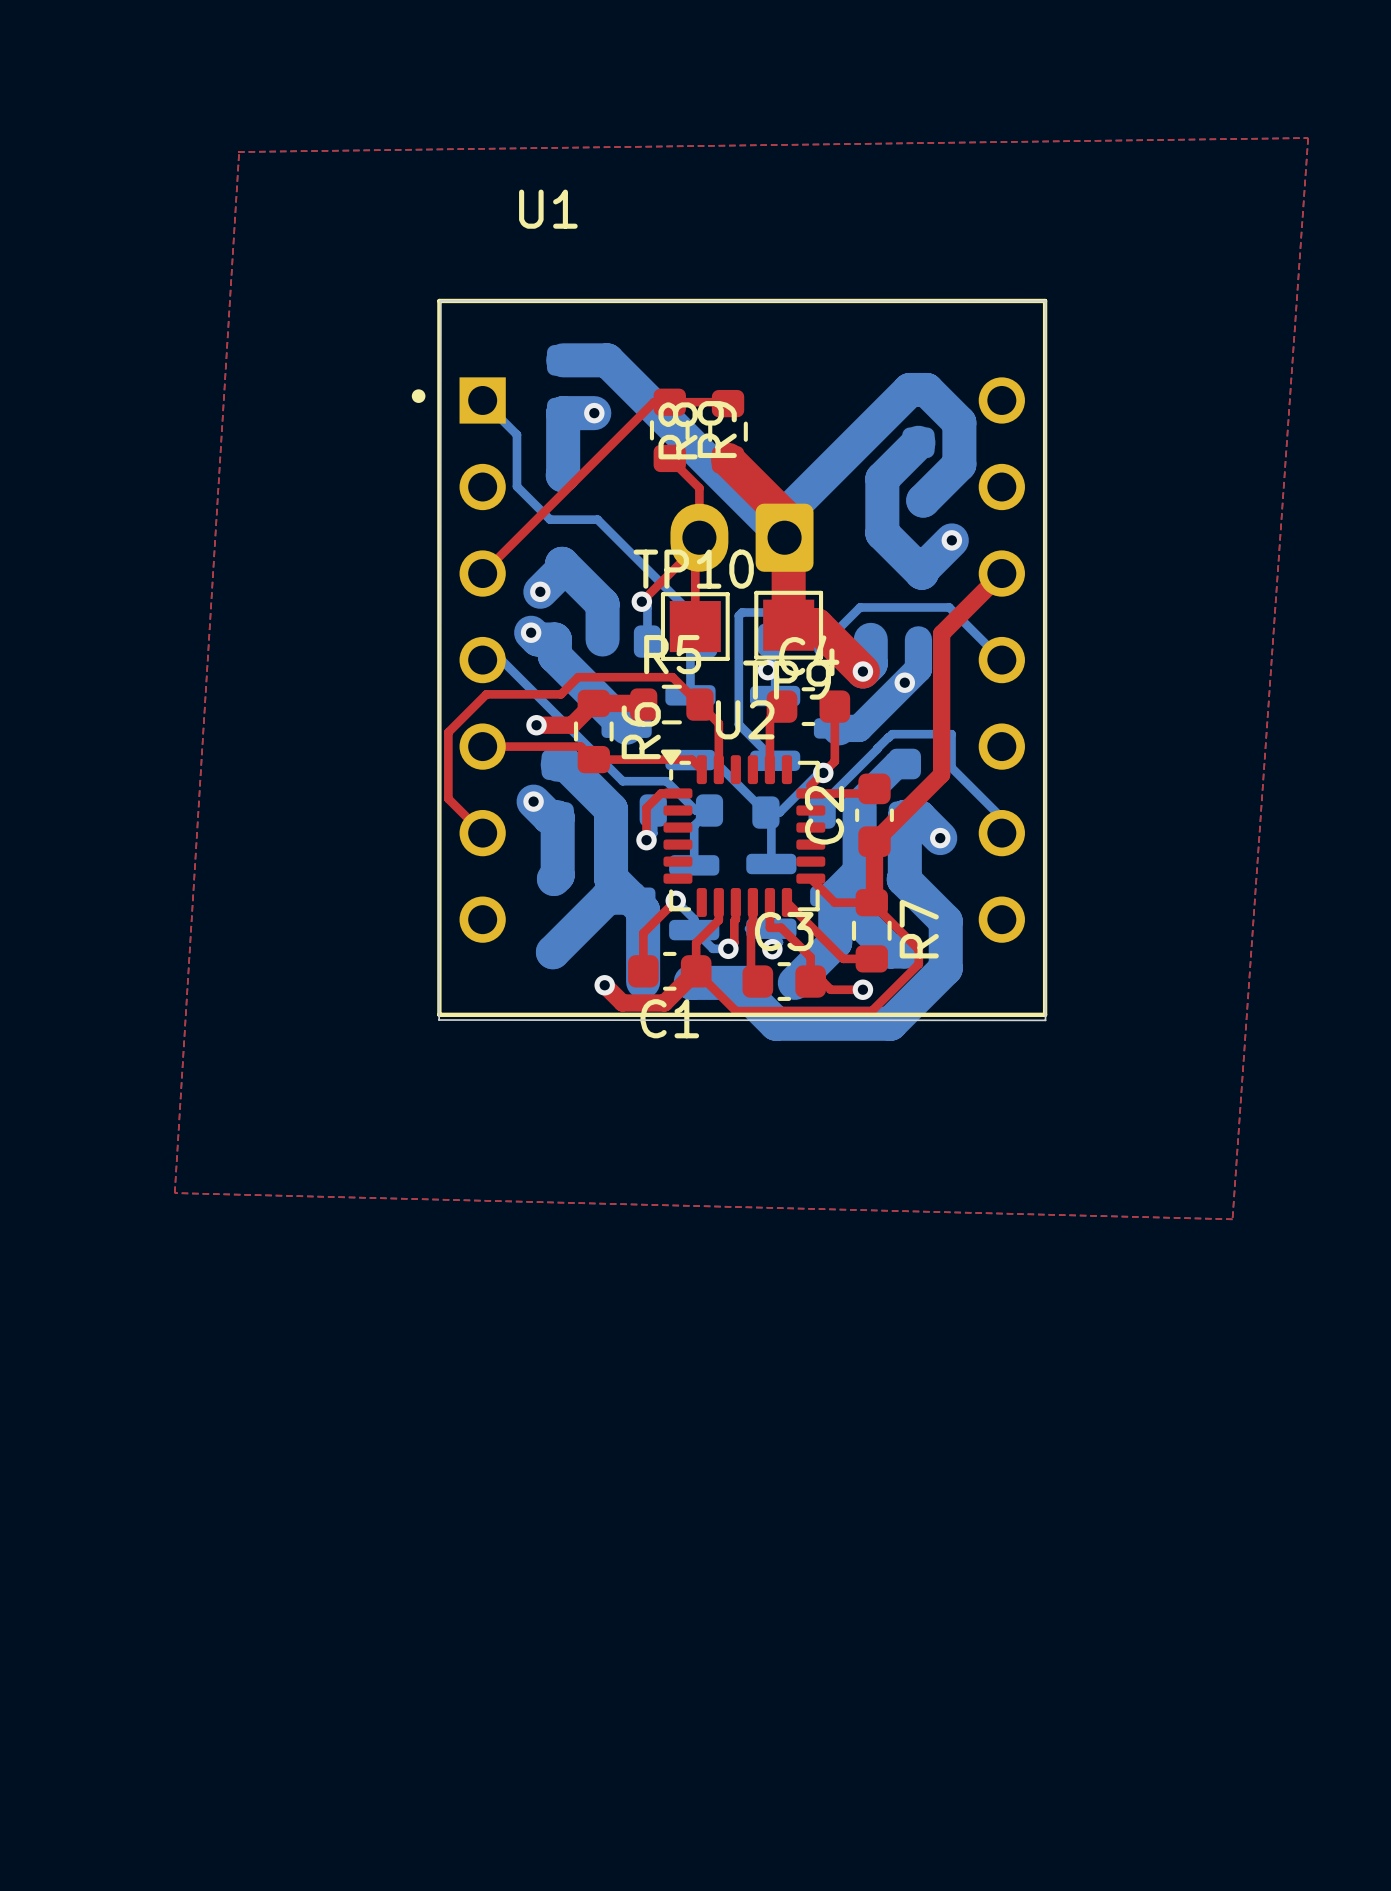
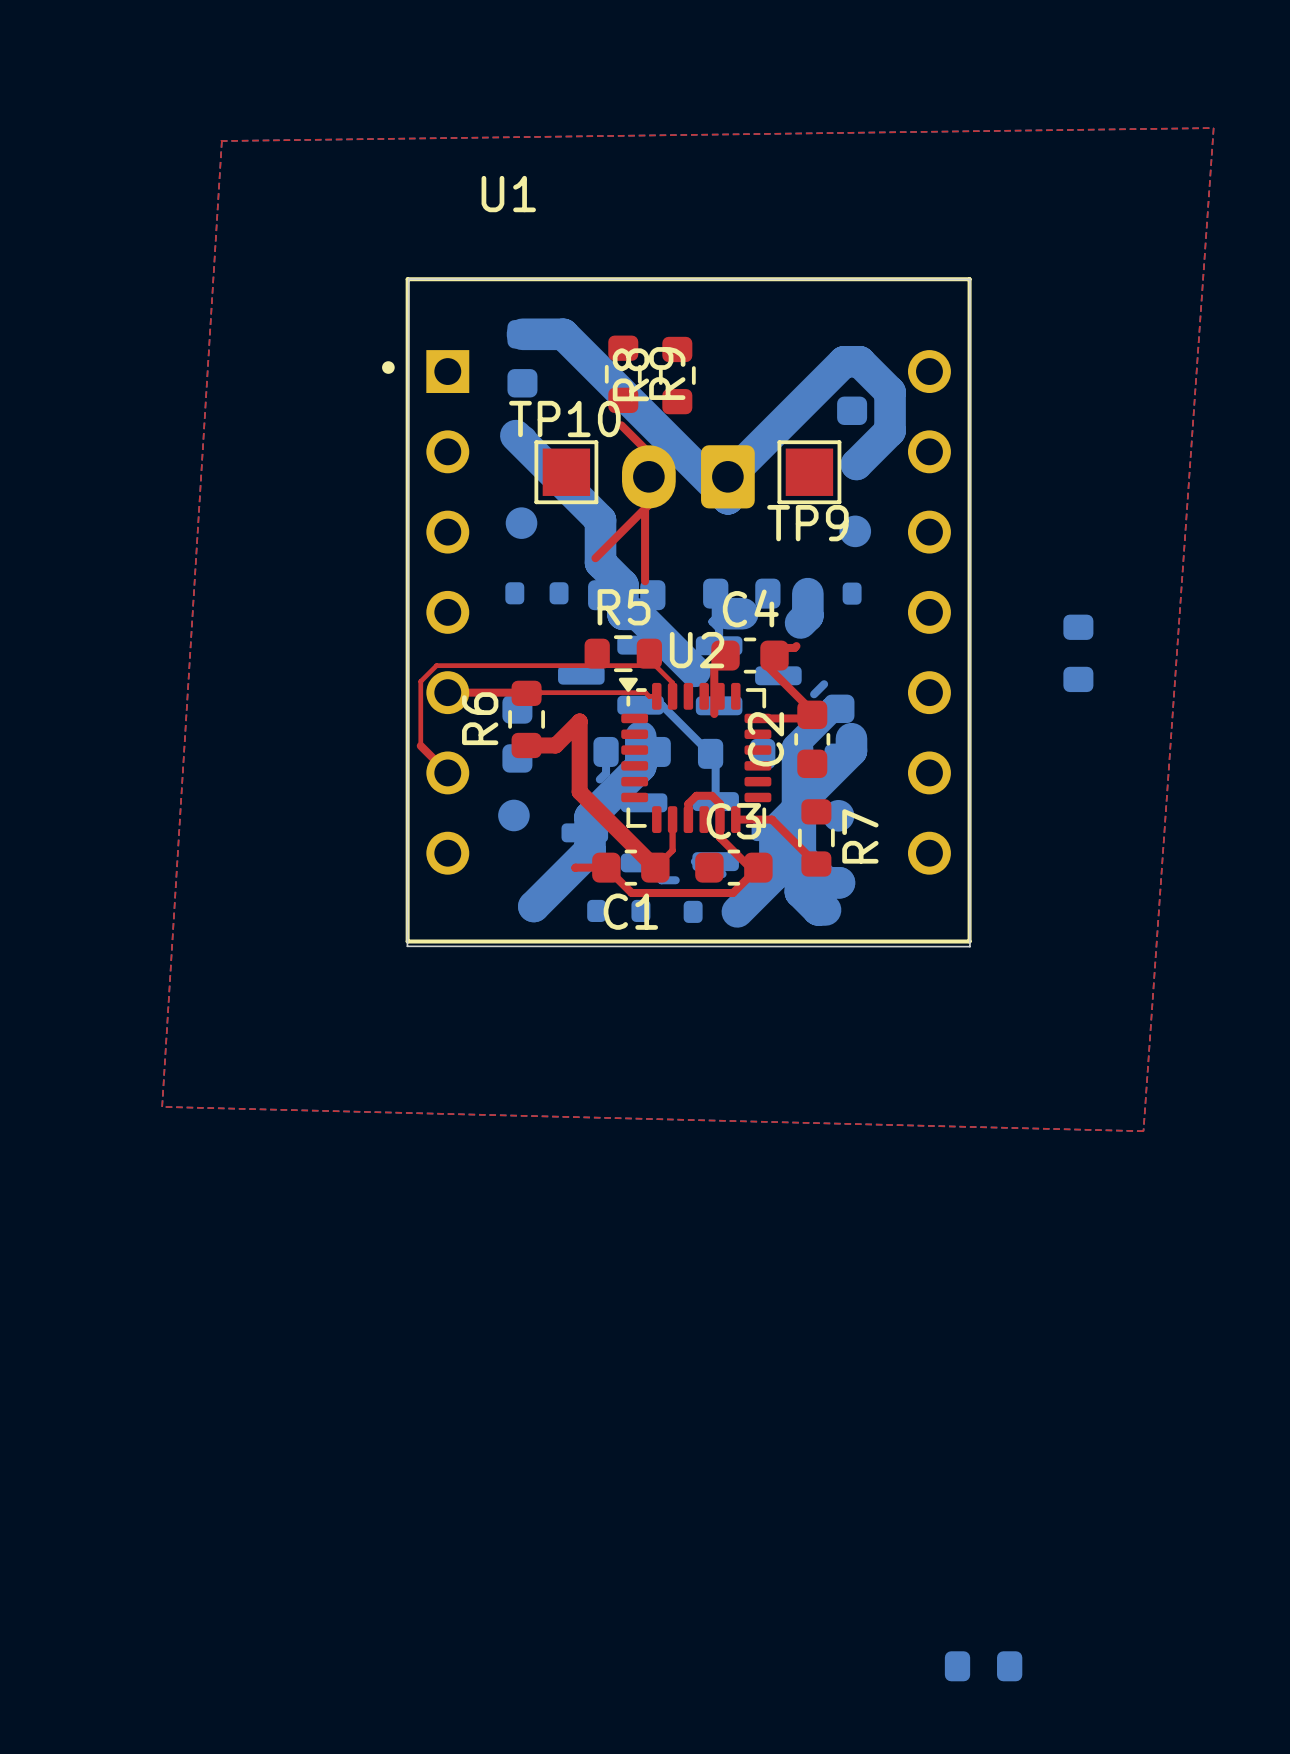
bottom track: (482, 400) (516, 434) (516, 486) (550, 519) (597, 519) (703, 625) (703, 641) (690, 654) (690, 695) -> none
top track: (728, 403) (653, 402) (482, 573) -> none
bottom track: (594, 413) (563, 413) (563, 474) -> none
via: (594, 413) -> none
R9 position: (669, 430) -> (623, 374)
R8 position: (728, 431) -> (677, 375)
bottom track: (918, 442) (882, 478) (882, 533) (921, 572) (921, 570) (951, 540) -> none
top track: (728, 459) (784, 516) (784, 537) (788, 541) (788, 625) (816, 625) (862, 671) -> none
bottom track: none -> (515, 435) (600, 520) (600, 562) (622, 585) (622, 614) (637, 614) (695, 671)
part position: (741, 537) -> (688, 476)
via: (951, 540) -> none
top track: (1001, 573) (941, 633) (941, 774) (874, 841) (874, 899) (871, 902) -> none
bottom track: (540, 591) (562, 570) (562, 563) (602, 604) (602, 639) -> none
via: (540, 591) -> none
via: (641, 601) -> none
TP9 position: (788, 625) -> (809, 472)
TP10 position: (695, 626) -> (566, 472)
bottom track: (531, 632) (537, 639) (554, 639) (554, 656) (626, 727) -> none
via: (531, 632) -> none
bottom track: (918, 639) (918, 669) (859, 728) (839, 728) -> none
bottom track: (482, 660) (501, 660) (622, 781) (666, 781) (695, 810) (709, 810) (694, 825) (694, 865) -> none
bottom track: (1001, 660) (949, 607) (860, 607) (827, 639) (800, 612) (742, 612) (738, 615) (738, 724) (775, 760) -> none
bottom track: none -> (727, 613) (742, 613)
via: (767, 670) -> none
via: (862, 671) -> none
via: (904, 682) -> none
top track: none -> (796, 646) (794, 647) (766, 647) (766, 665) (812, 711) (812, 714) (808, 718) (757, 718)
top track: (643, 704) (593, 703) (571, 725) (536, 725) -> none
part: none -> (1078, 653)
top track: (834, 706) (834, 761) (810, 785) (810, 793) (869, 793) (874, 788) -> none
via: (536, 725) -> none
R6 name position: R6 (641, 730) -> R6 (480, 718)
R6 position: (593, 731) -> (526, 719)
bottom track: (888, 737) (892, 734) (951, 734) (951, 767) (1001, 817) (1001, 833) -> none
top track: (580, 746) (593, 759) (691, 759) (701, 769) -> (538, 692) (645, 692) (649, 696) (656, 696)
bottom track: (877, 748) (822, 804) (822, 812) -> none
bottom track: (557, 764) (566, 764) (611, 809) (611, 878) (643, 910) (643, 981) -> none
top track: (718, 769) (718, 723) (672, 677) (578, 677) (561, 694) (486, 694) (448, 732) (448, 798) (453, 803) -> (672, 696) (672, 682) (655, 665) (436, 665) (420, 681) (420, 745)
bottom track: (823, 772) (819, 772) (779, 812) (765, 812) -> none
via: (823, 772) -> none
top track: (677, 793) (661, 793) (646, 807) (646, 840) -> none
bottom track: none -> (640, 736) (640, 766) (590, 817) (590, 850) (533, 906)
bottom track: none -> (851, 738) (851, 750) (800, 801) (800, 892) (818, 909) (825, 909)
bottom track: (533, 801) (549, 817) (557, 817) (557, 875) (553, 878) -> none
via: (533, 801) -> none
top track: none -> (526, 745) (555, 745) (579, 721) (579, 791) (655, 867) (672, 850) (672, 819)
C2 position: (874, 815) -> (812, 739)
U2 position: (743, 833) -> (695, 755)
bottom track: (940, 838) (918, 816) (904, 816) (903, 879) (945, 921) (945, 968) (890, 1023) (776, 1023) (747, 994) (747, 982) (690, 981) -> none
via: (940, 838) -> none
via: (646, 840) -> none
top track: (810, 878) (834, 902) (871, 902) -> none
top track: none -> (688, 819) (688, 803) (696, 795) (711, 795) (719, 803) (719, 837) (750, 867) (758, 867) (733, 893) (631, 893) (606, 867) (575, 867)
top track: none -> (735, 819) (771, 819) (816, 864)
bottom track: (630, 897) (607, 897) (552, 952) -> none
top track: (675, 900) (643, 933) (643, 971) -> none
via: (675, 900) -> none
top track: (718, 902) (718, 920) (696, 942) (696, 971) -> none
top track: (735, 902) (734, 942) (728, 948) -> none
top track: (769, 902) (769, 927) (781, 927) (810, 957) (810, 981) -> none
top track: (786, 902) (843, 958) (871, 958) -> none
top track: (871, 902) (918, 949) (918, 964) (871, 1011) (736, 1011) (696, 971) -> none
top track: (753, 903) (752, 922) (750, 924) (750, 974) (757, 981) (757, 973) -> none
R7 position: (871, 930) -> (816, 837)
via: (728, 948) -> none
via: (772, 949) -> none
C1 position: (669, 971) -> (630, 867)
top track: (696, 971) (664, 1002) (622, 1002) (604, 985) -> none
C3 position: (784, 981) -> (733, 867)
top track: (810, 981) (822, 981) (830, 989) (862, 989) -> none
via: (604, 985) -> none
via: (862, 989) -> none
part: none -> (983, 1666)

